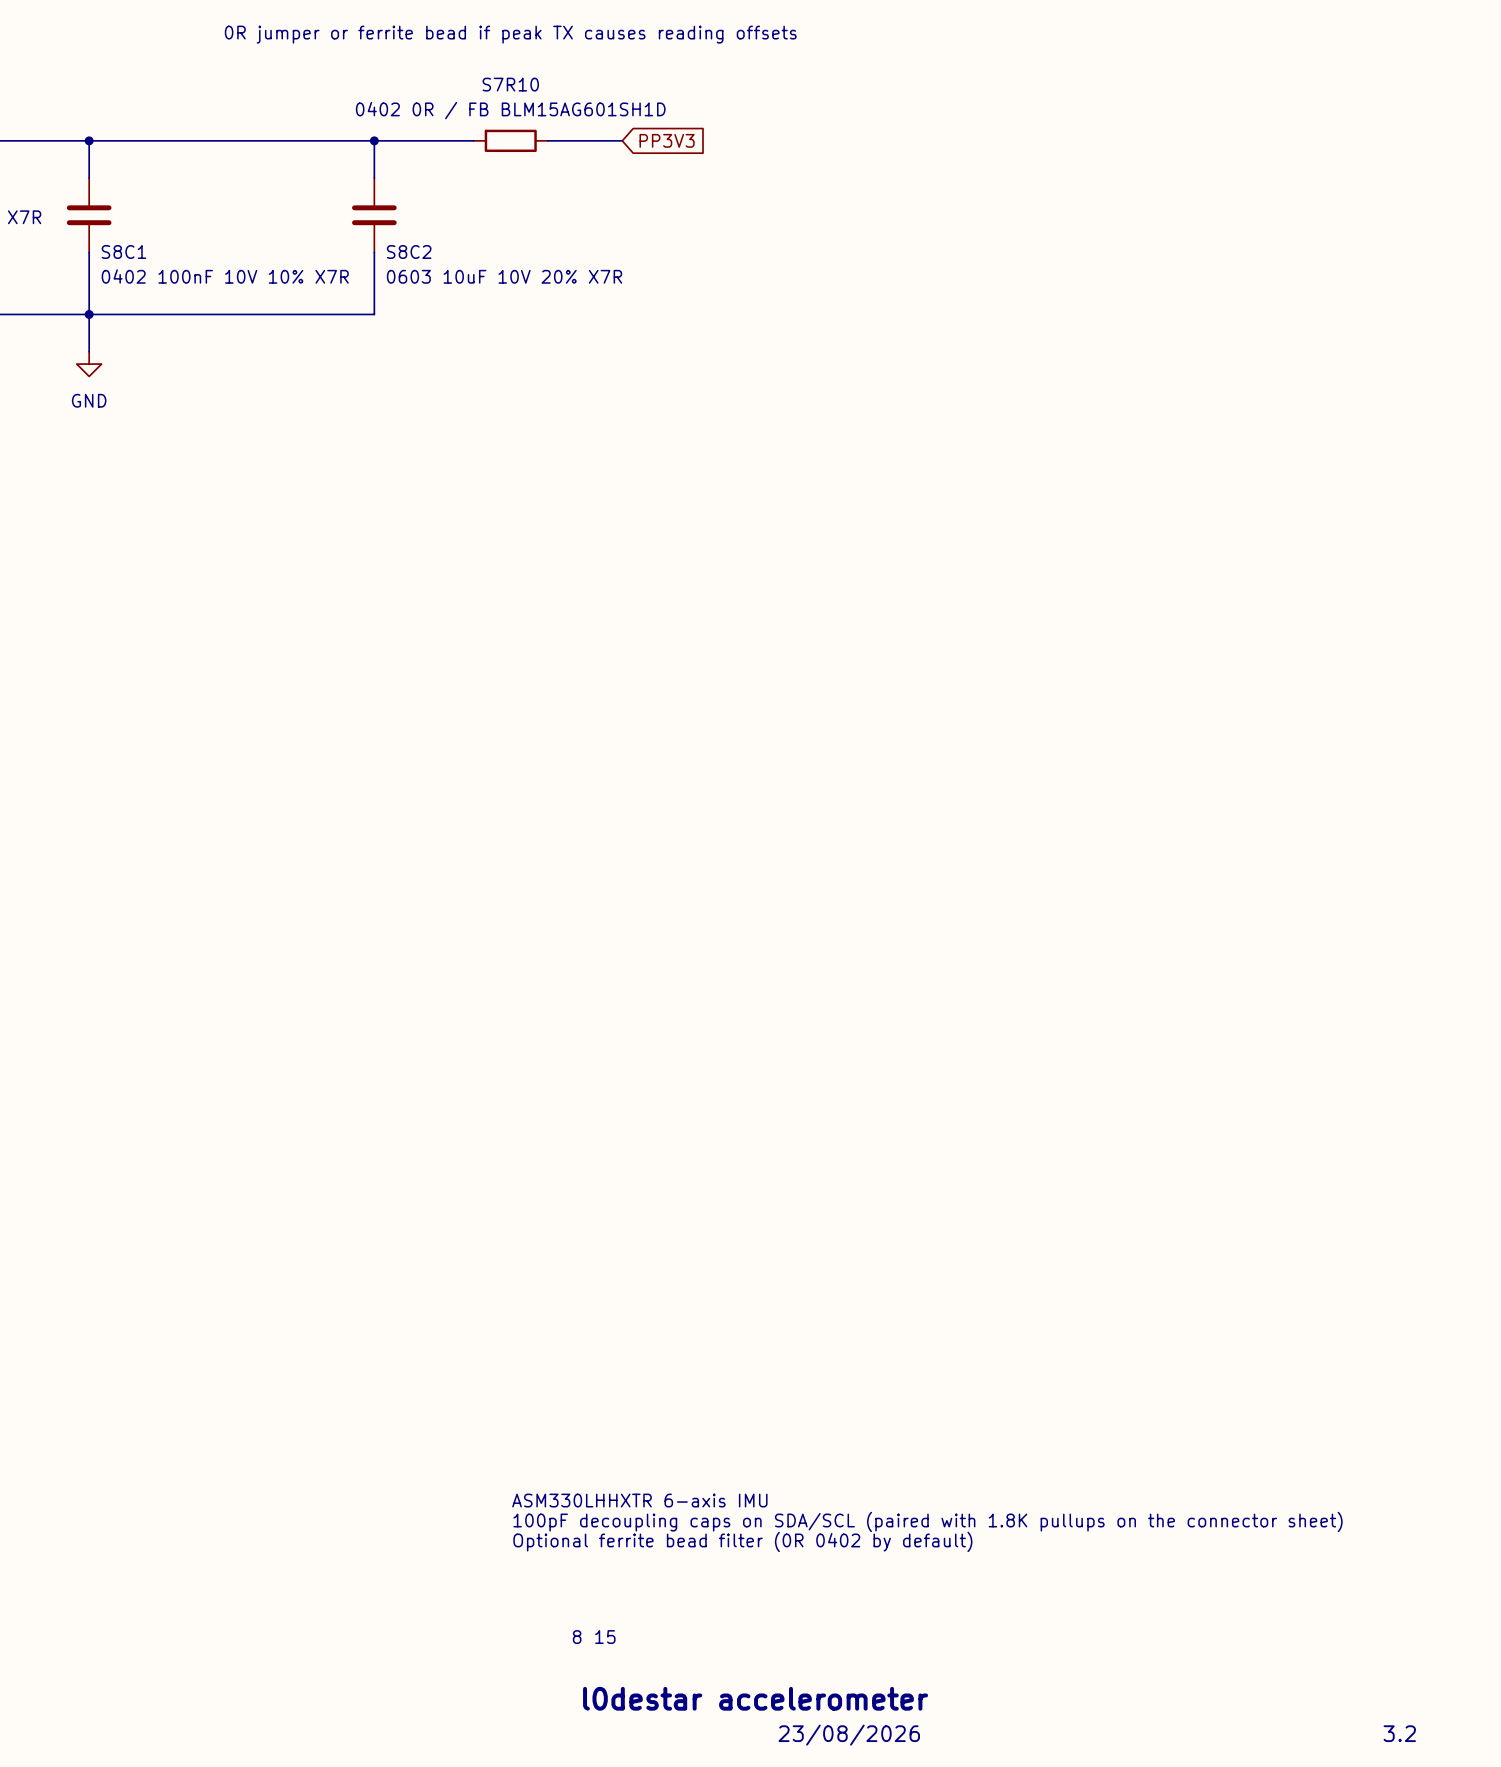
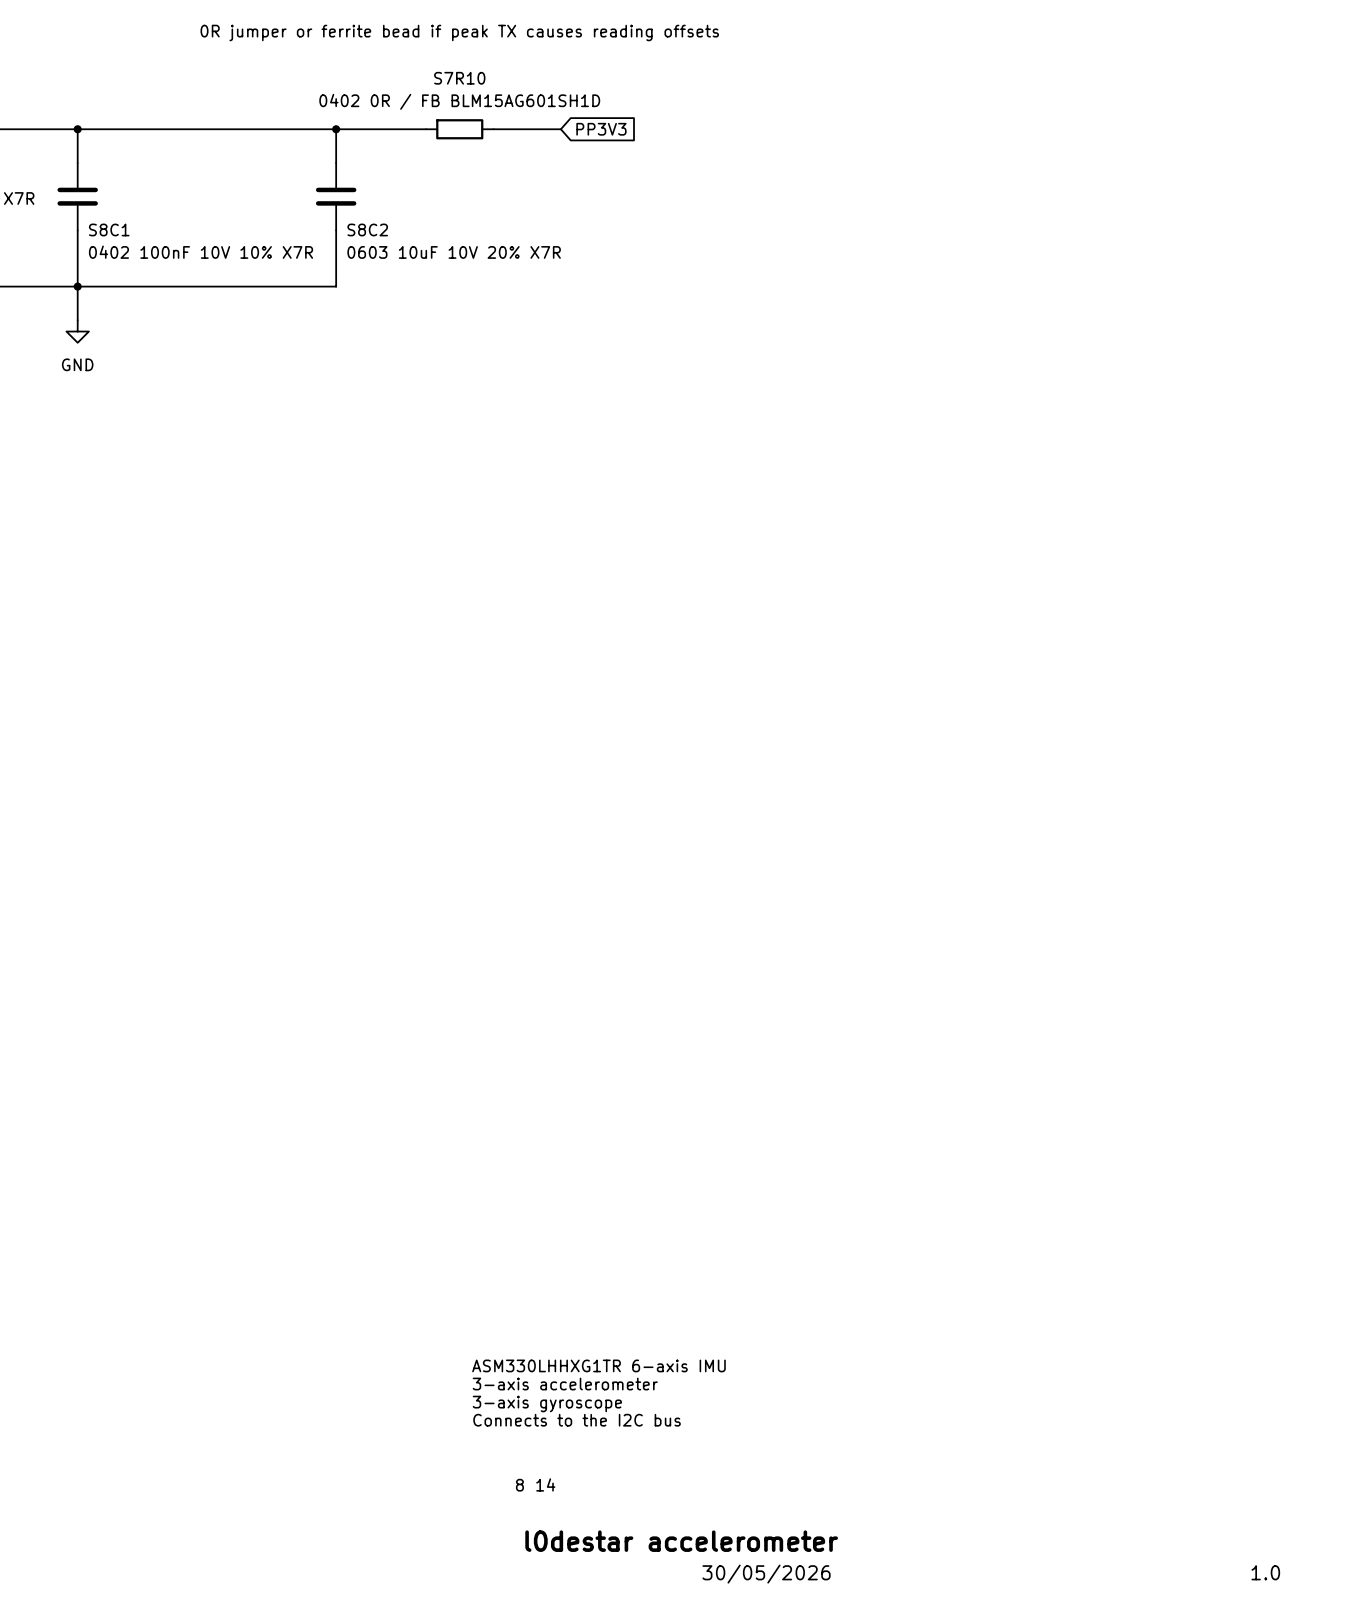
text: ASM330LHHXTR 6-axis IMU (639, 1500) -> ASM330LHHXG1TR 6-axis IMU (598, 1365)
text: 100pF decoupling caps on SDA/SCL (paired with 1.8K pullups on the connector sheet) (927, 1521) -> none
text: none -> 3-axis accelerometer (565, 1384)
text: Optional ferrite bead filter (0R 0402 by default) (742, 1541) -> none
text: none -> 3-axis gyroscope (547, 1403)
text: none -> Connects to the I2C bus (577, 1420)
text: 15 (605, 1637) -> 14 (545, 1484)
text: 3.2 (1399, 1733) -> 1.0 (1265, 1572)
text: 23/08/2026 (849, 1735) -> 30/05/2026 (766, 1574)

